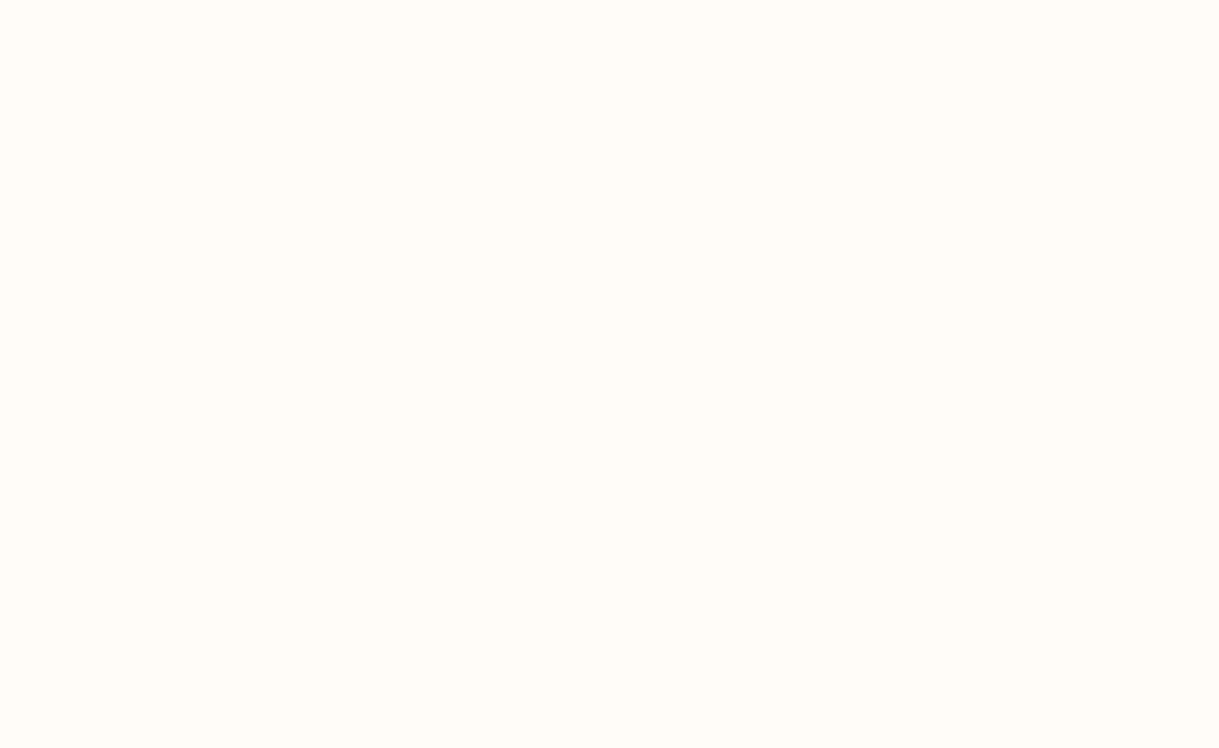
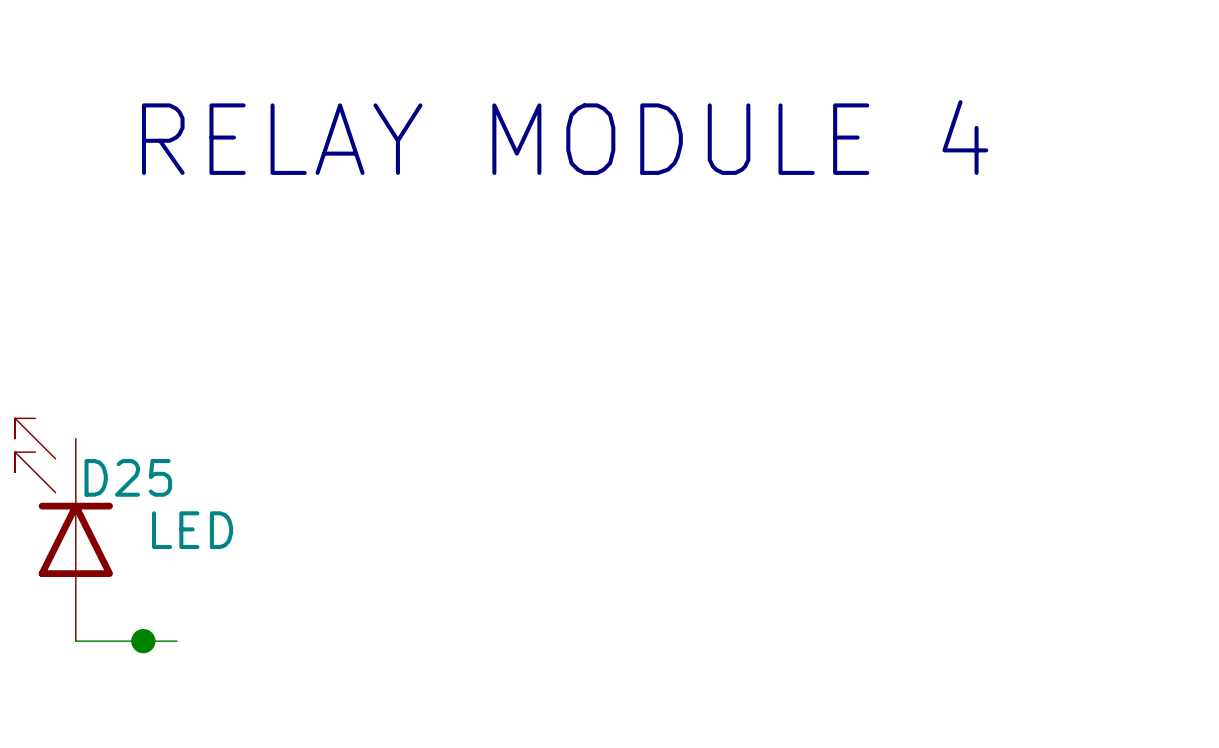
text: none -> RELAY MODULE 4 (565, 137)
D25: none -> LED (64, 529)
wire: none -> (75, 641) (177, 641)
junction: none -> (143, 641)

